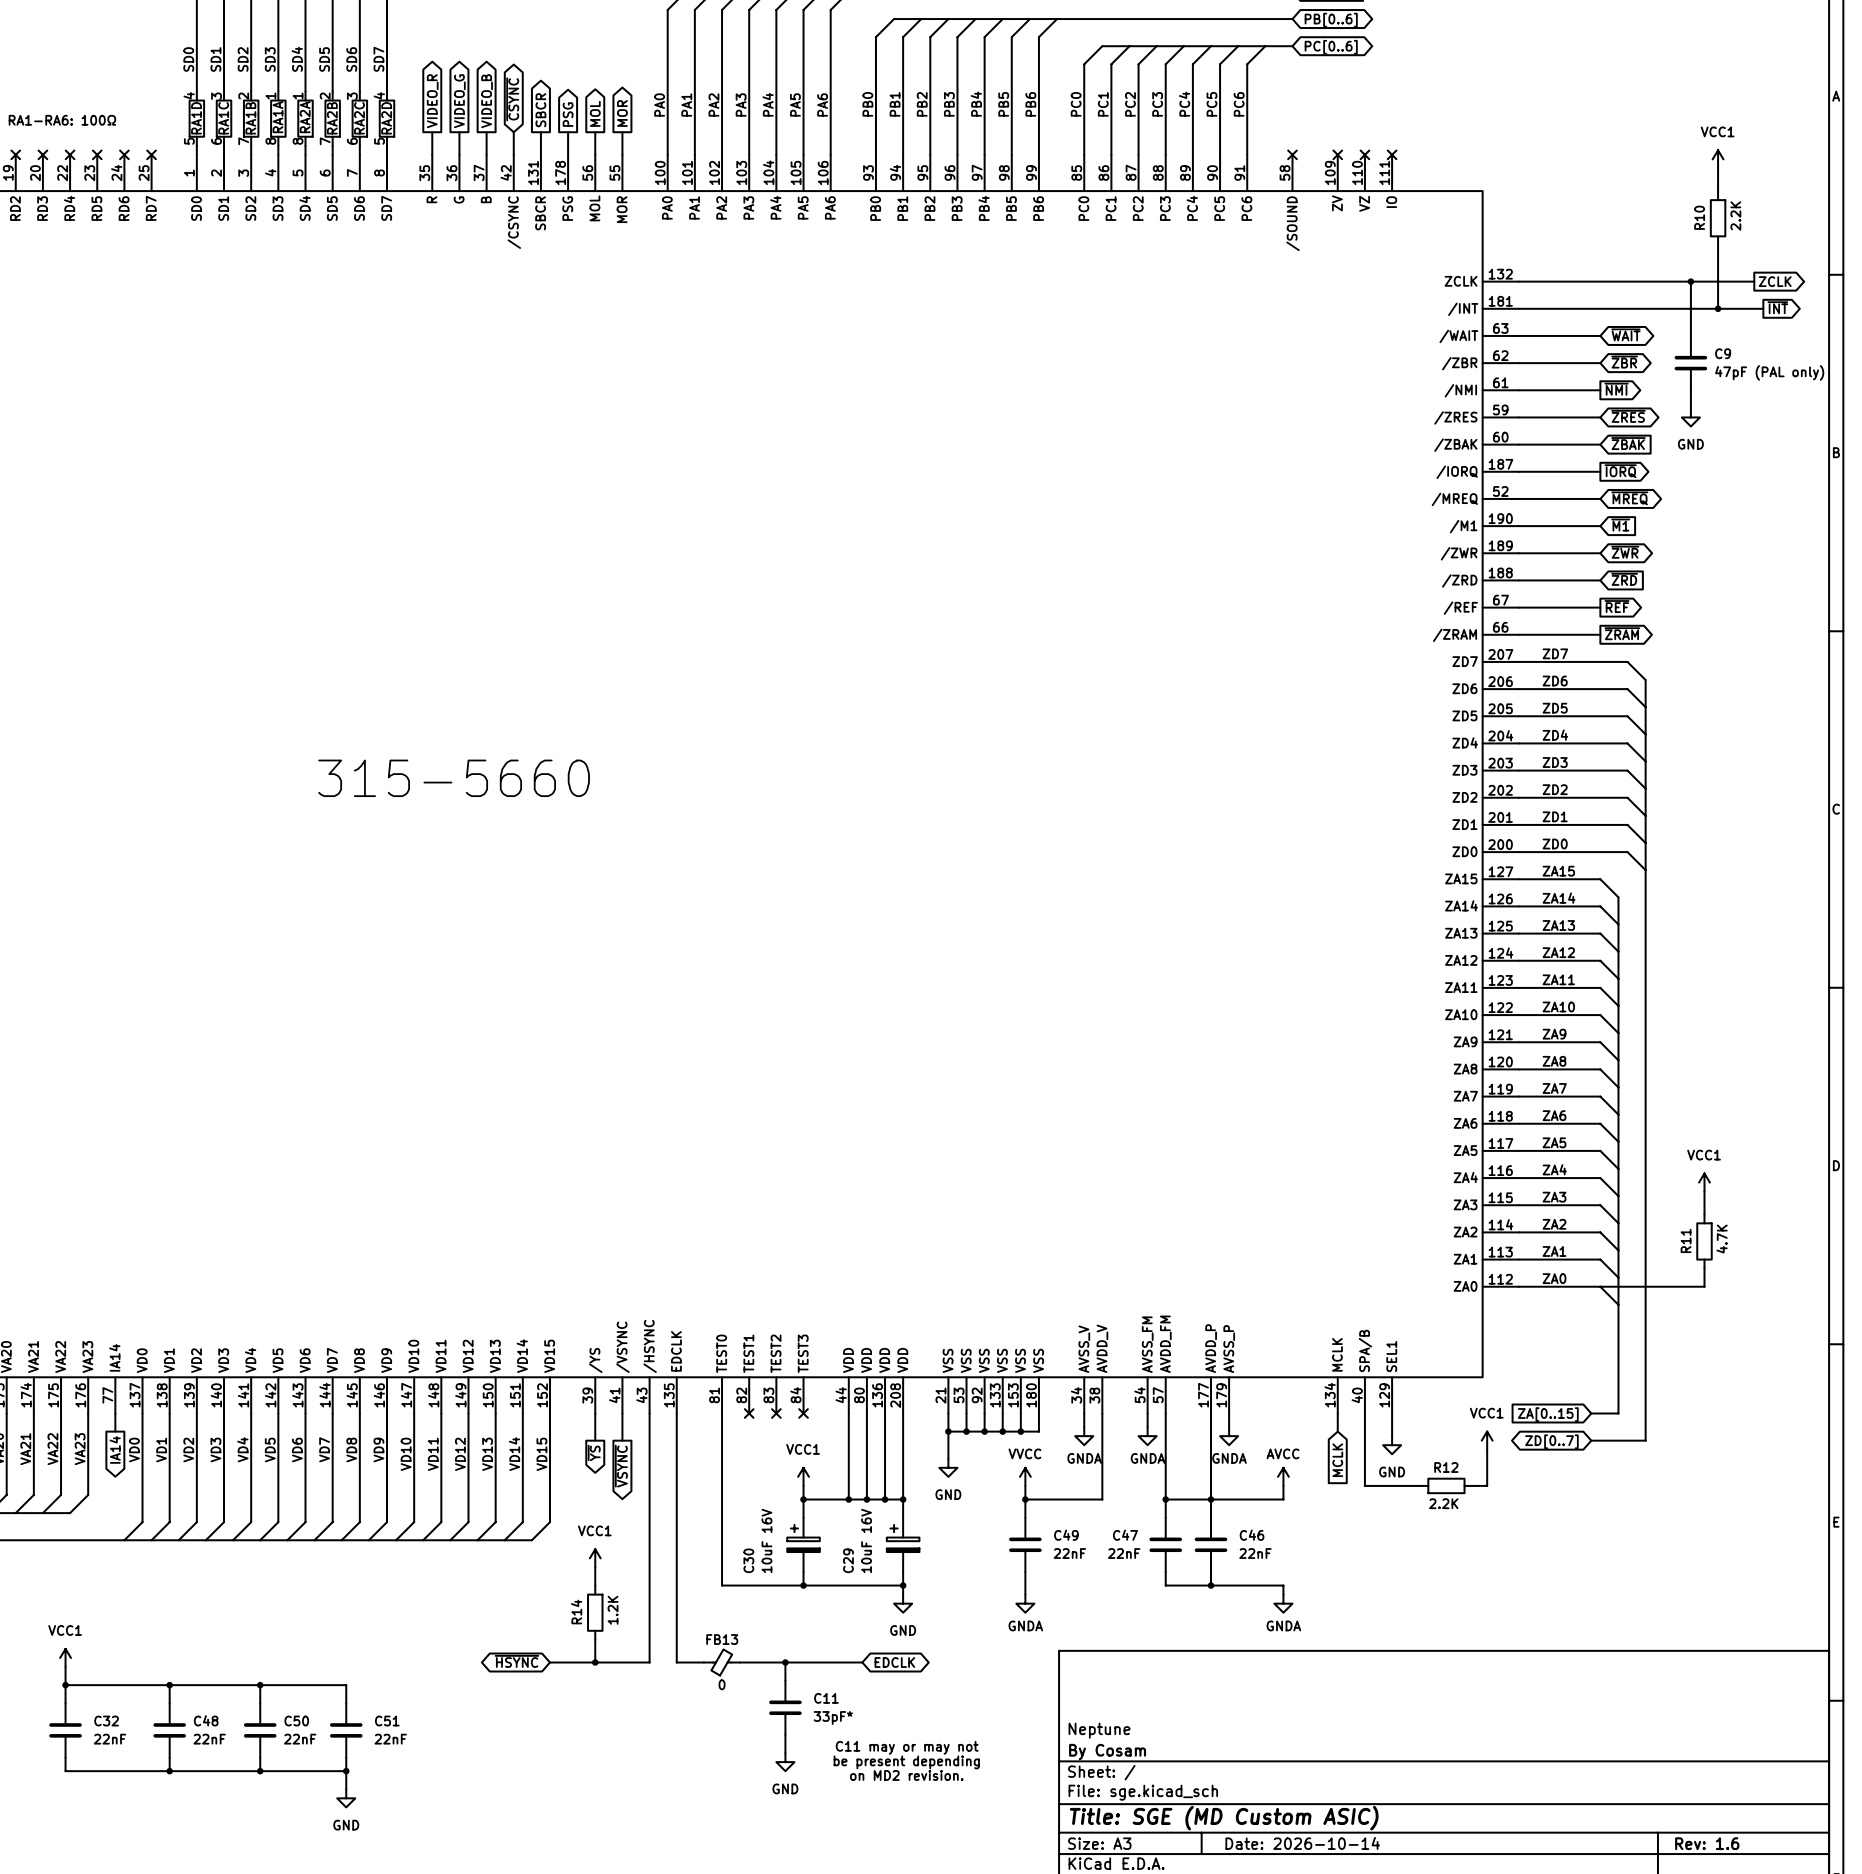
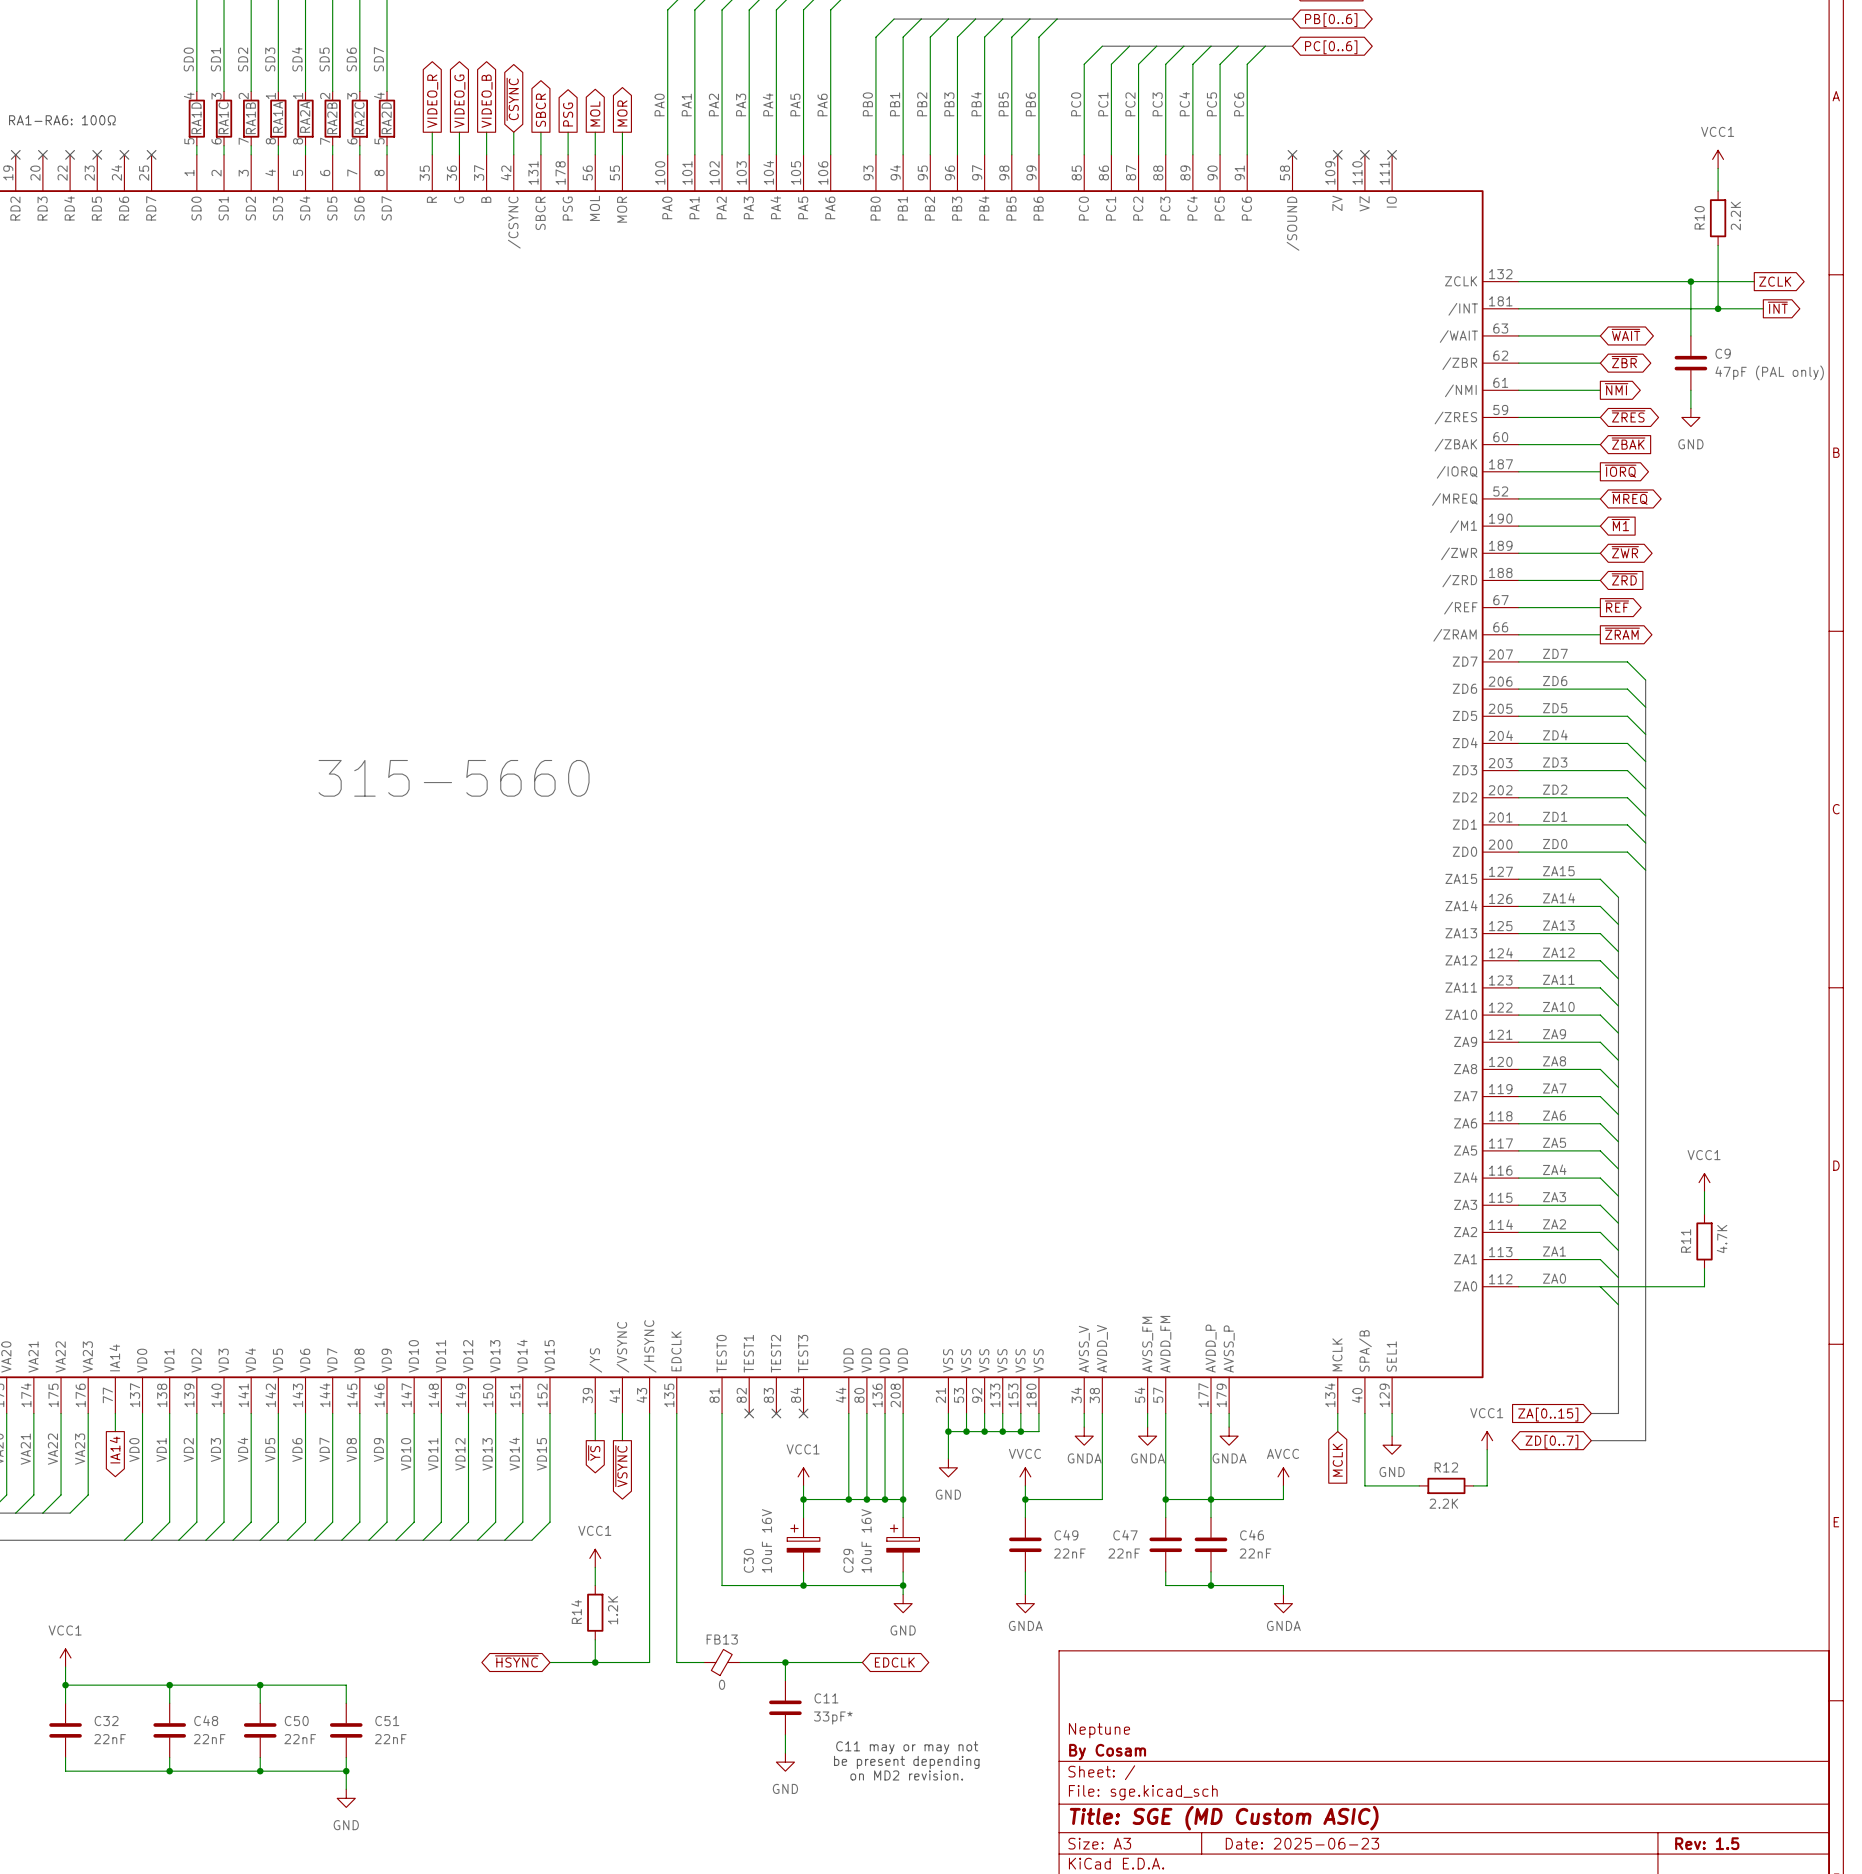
title block: Date: 2026-10-14 (1302, 1843) -> Date: 2025-06-23 (1302, 1843)
title block: Rev: 1.6 (1707, 1843) -> Rev: 1.5 (1707, 1843)

